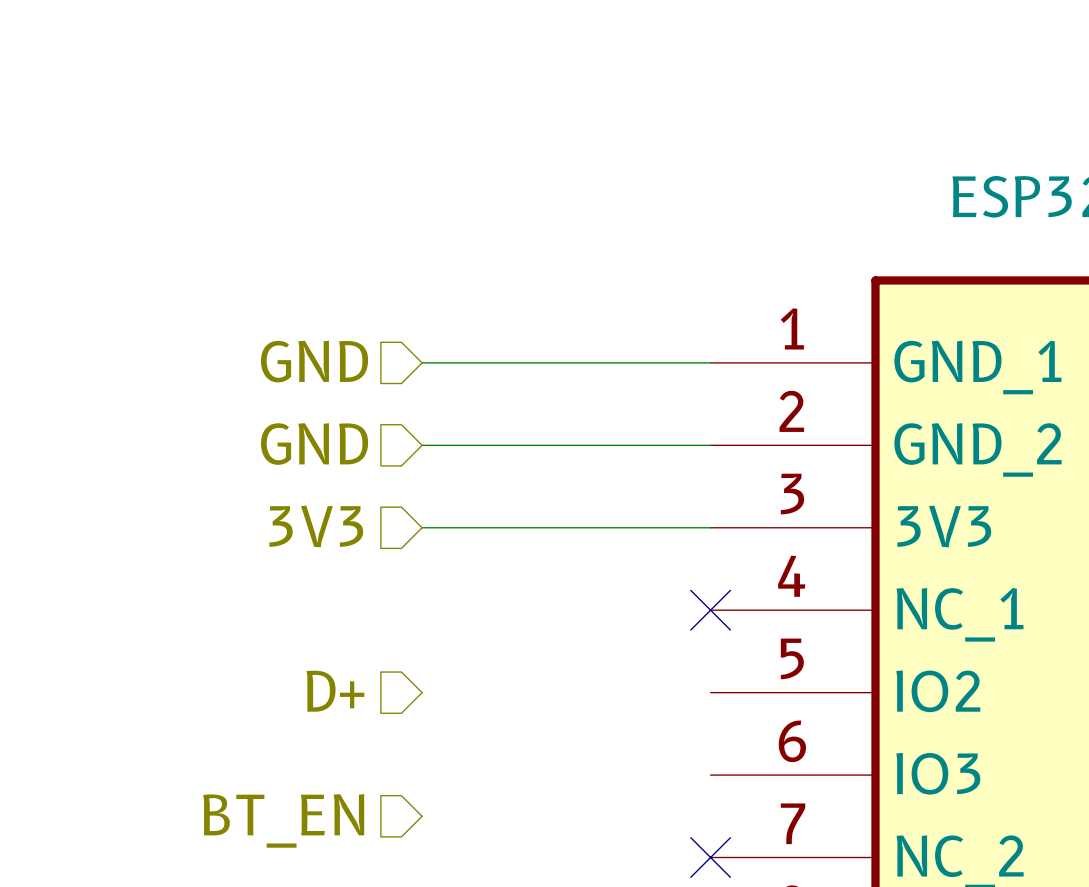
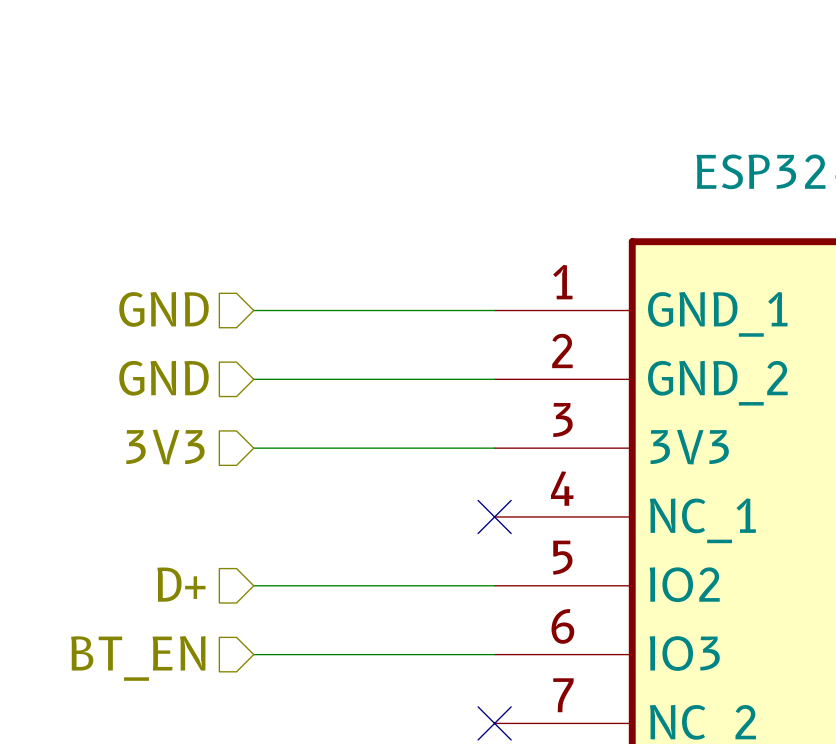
wire: none -> (253, 585) (494, 585)
wire: none -> (253, 654) (494, 654)
hierarchical label position: BT_EN (283, 820) -> BT_EN (138, 658)

